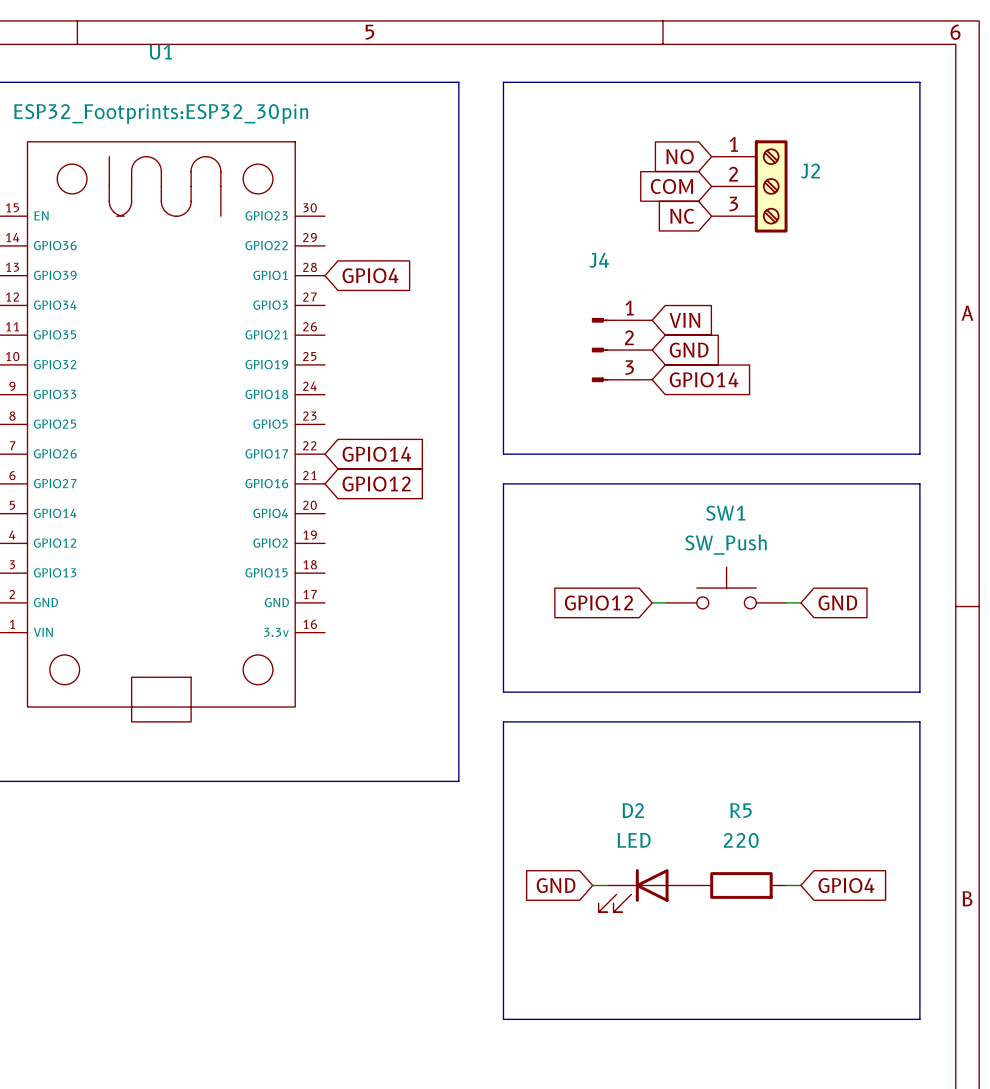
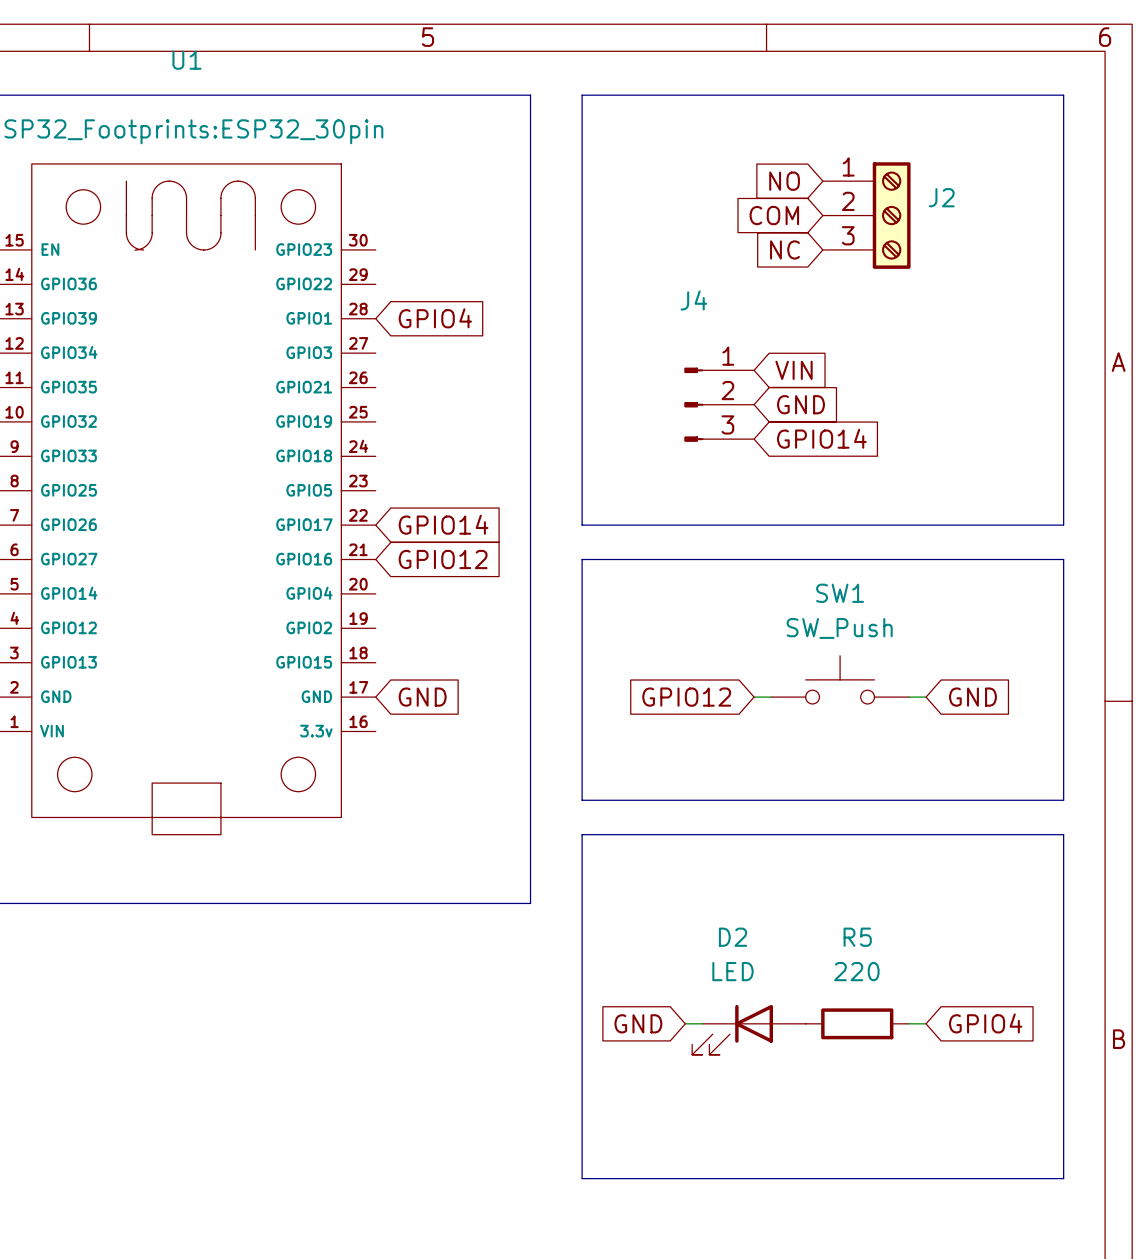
global label: none -> GND (422, 697)

